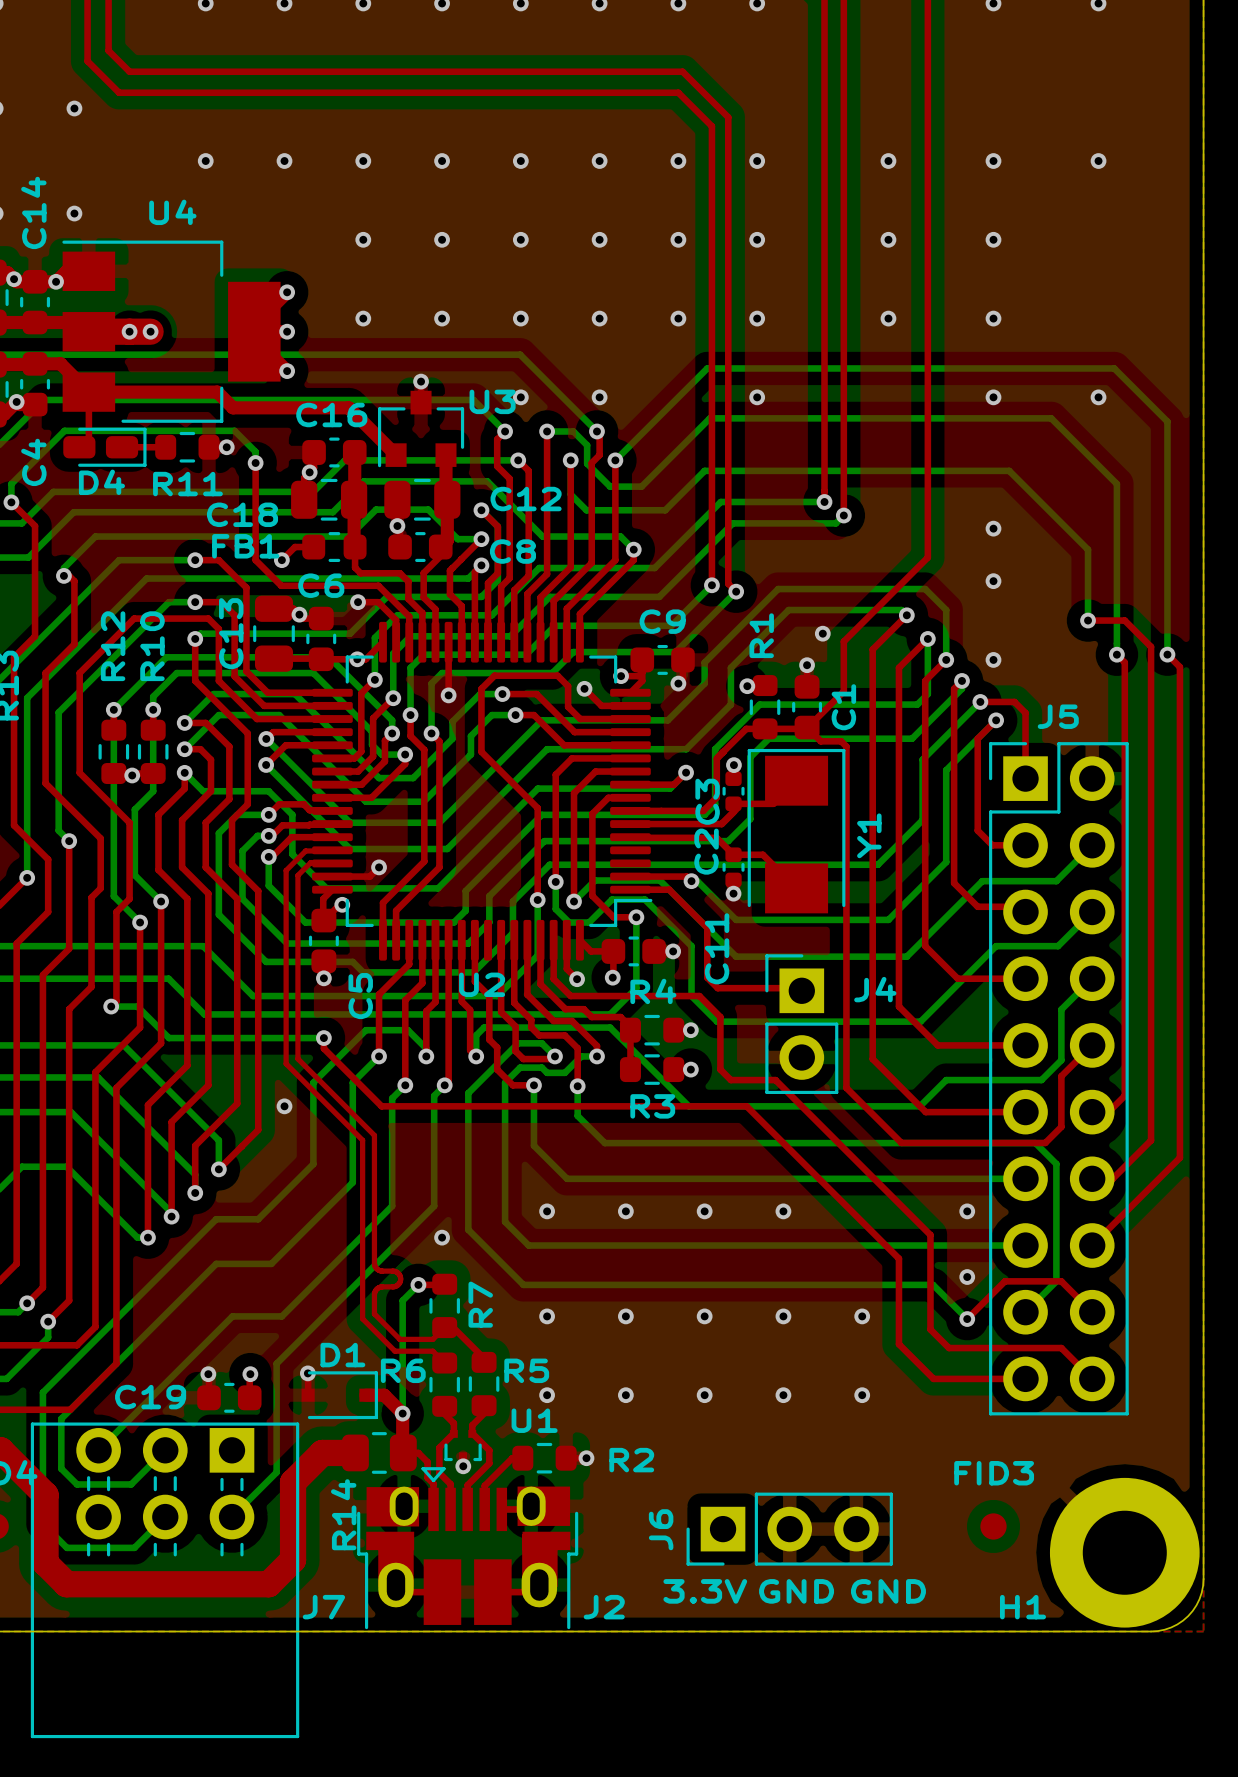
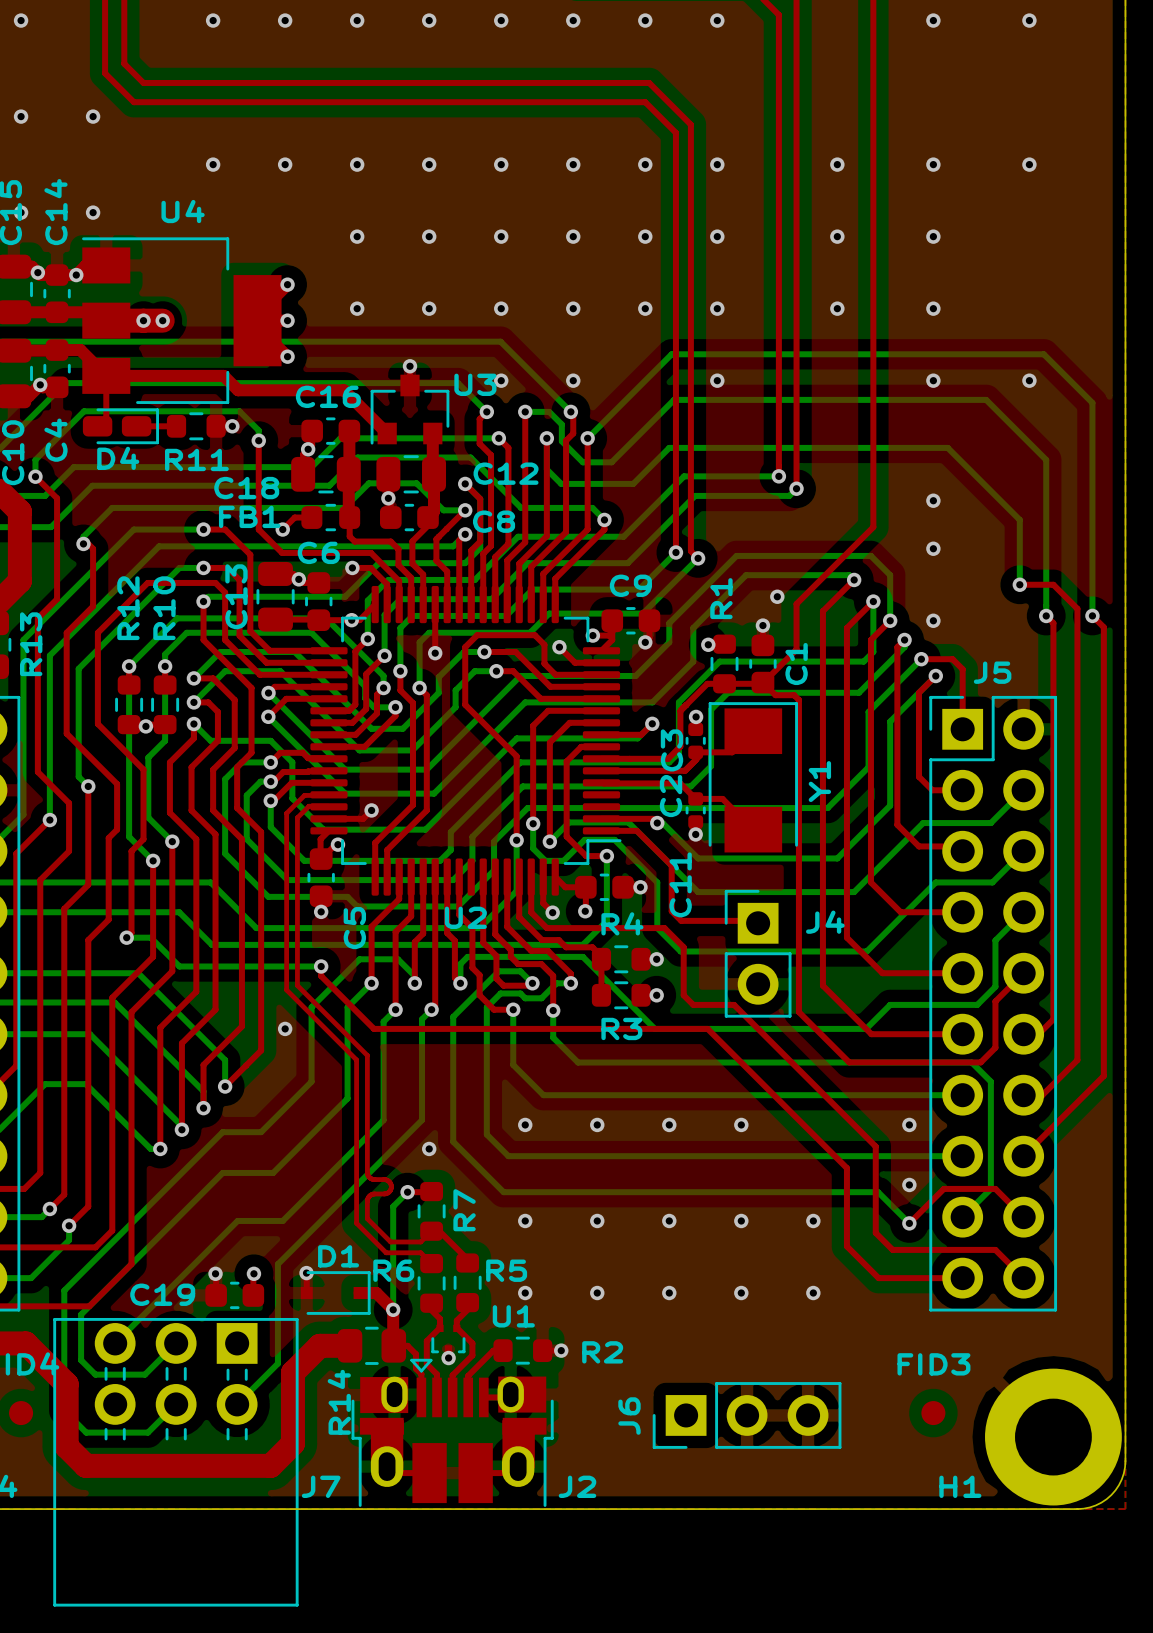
text: 3.3V (705, 1591) -> none
text: GND (796, 1591) -> none
text: GND (888, 1591) -> none

